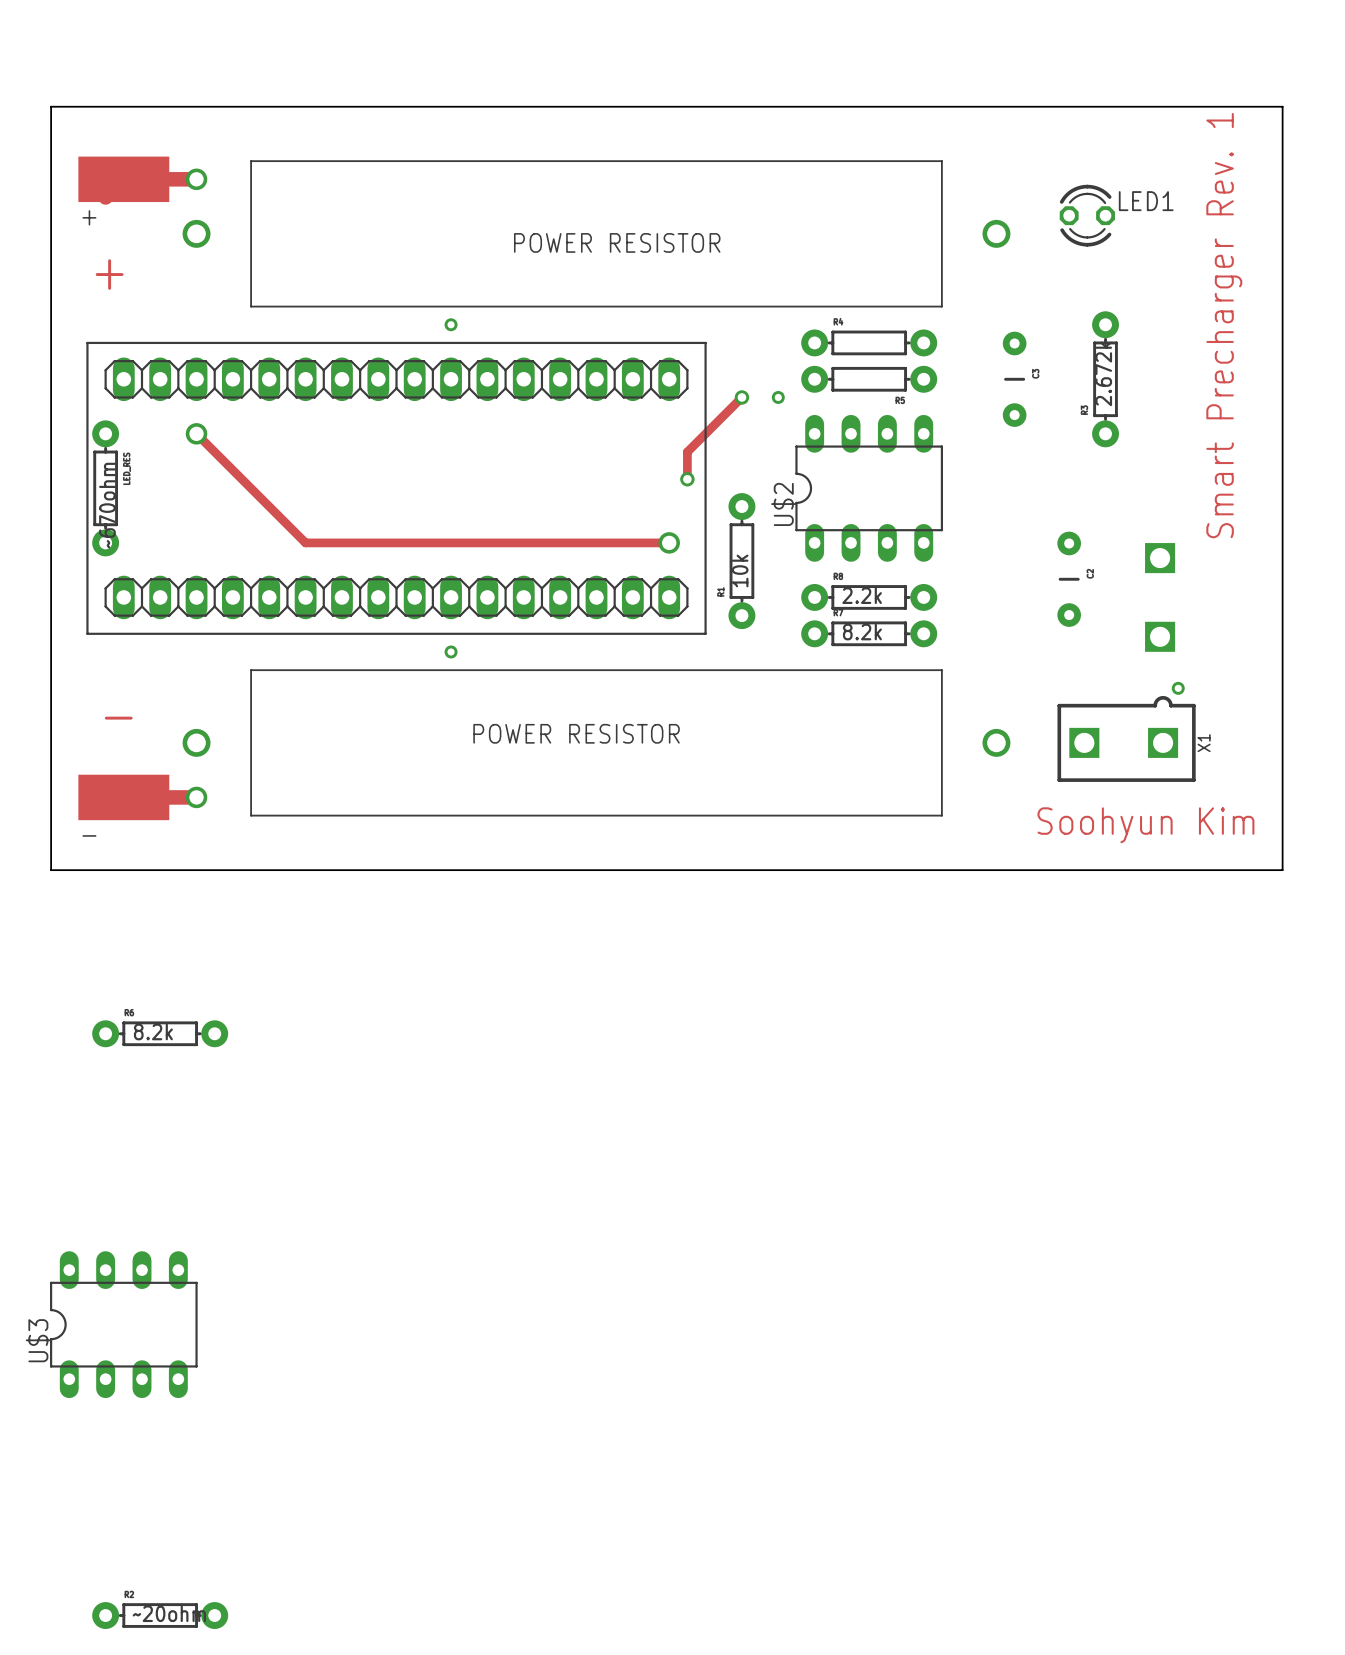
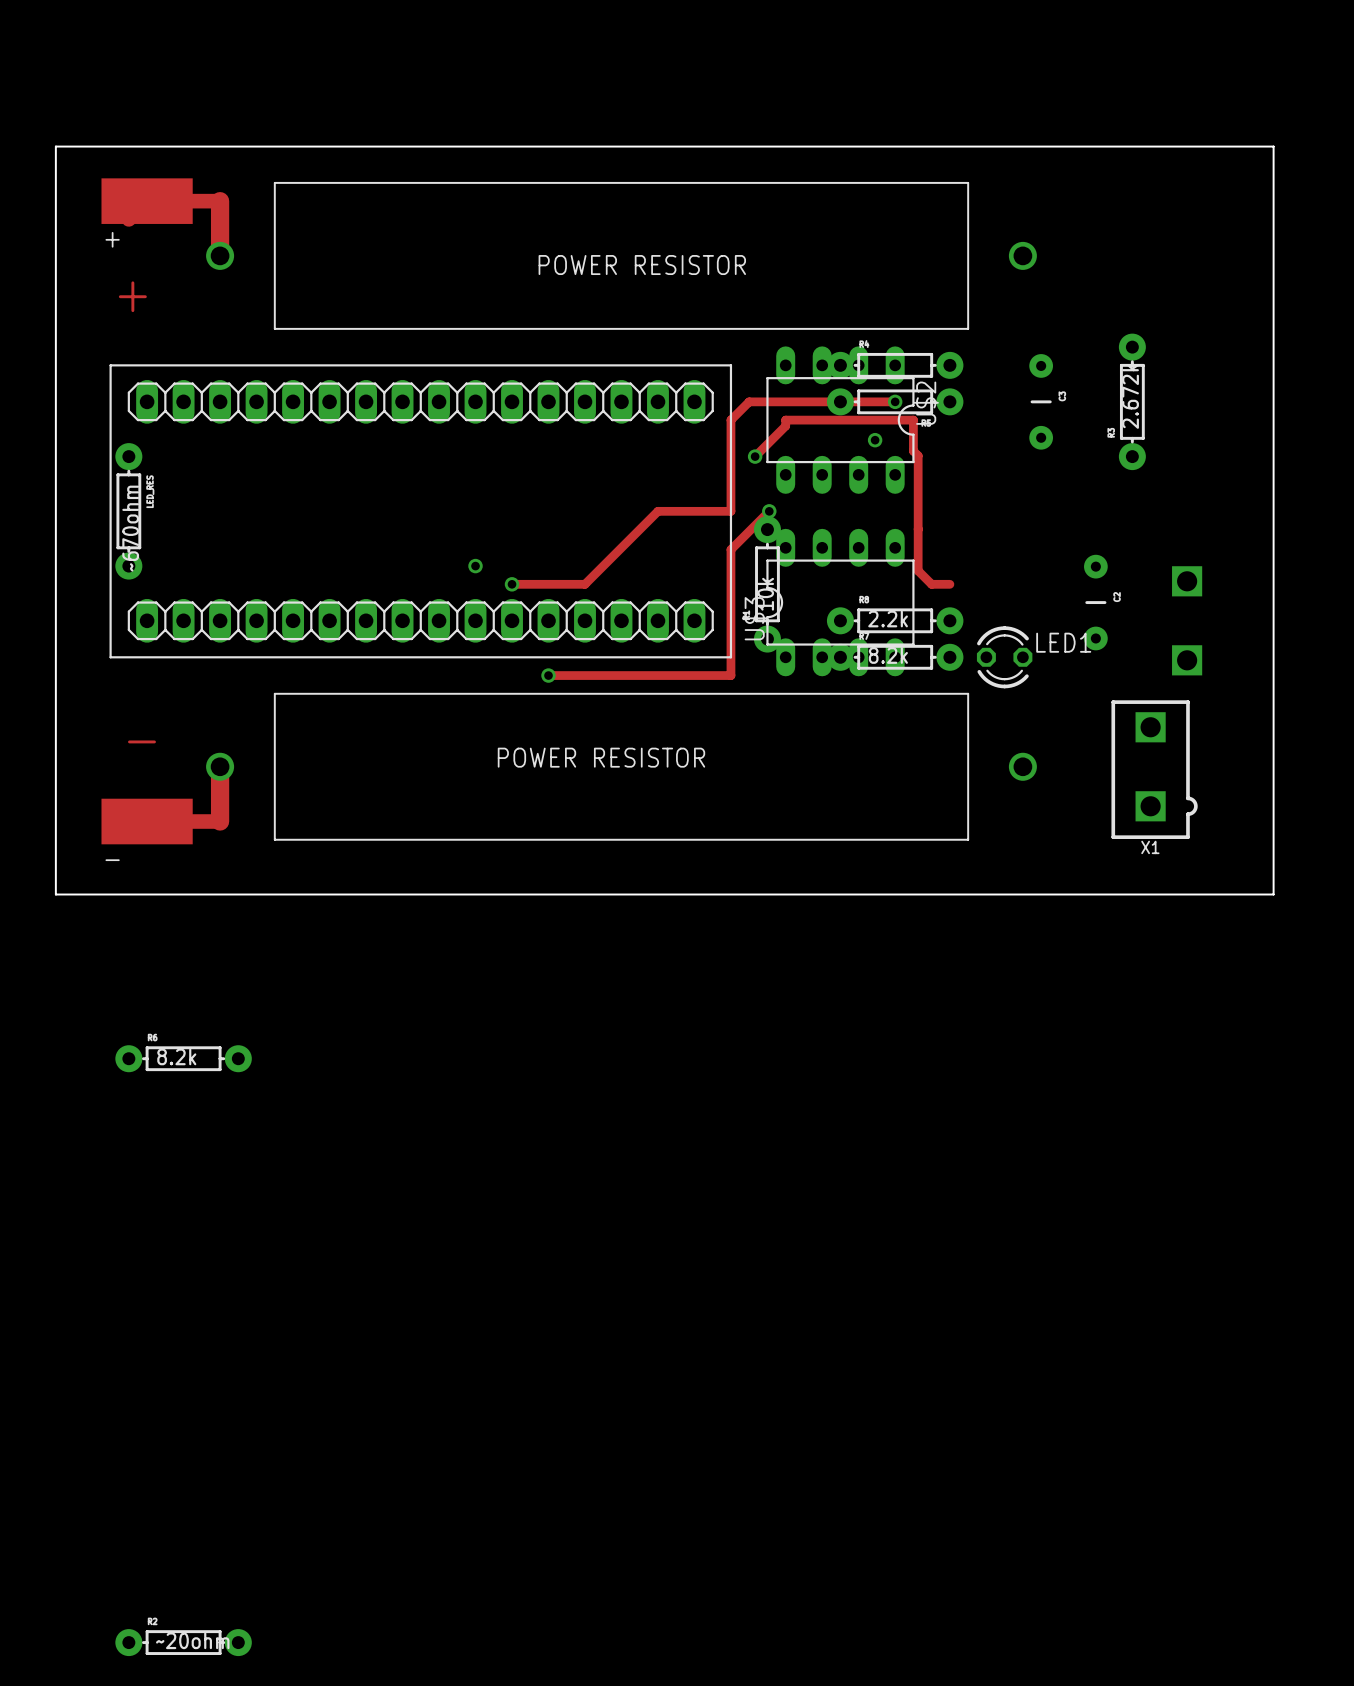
track: none -> (220, 201) (220, 255)
via: (196, 179) -> none
LED1 position: (1087, 215) -> (1004, 657)
via: (451, 324) -> none
text: Smart Precharger Rev. 1 (1224, 325) -> none
track: none -> (895, 401) (749, 401) (730, 420) (730, 511) (657, 511) (585, 584) (512, 584)
via: none -> (895, 401)
track: (741, 397) (687, 452) (687, 479) -> none
via: (741, 397) -> none
via: (778, 397) -> none
via: none -> (875, 440)
track: (196, 433) (305, 542) (669, 542) -> none
via: (196, 433) -> none
track: none -> (755, 456) (785, 426) (785, 420) (913, 420) (913, 451) (918, 455) (918, 570) (931, 584) (949, 584)
via: none -> (755, 456)
via: (687, 479) -> none
track: none -> (769, 511) (730, 549) (730, 675) (548, 675)
via: none -> (769, 511)
U$2 rotation: 0° (869, 488) -> 180° (840, 420)
U$2 position: (869, 488) -> (840, 420)
via: none -> (475, 566)
via: (669, 542) -> none
via: none -> (512, 584)
via: (451, 651) -> none
via: none -> (548, 675)
via: (1178, 688) -> none
X1 rotation: 0° (1126, 738) -> 90° clockwise (1154, 769)
track: none -> (220, 766) (220, 821)
via: (196, 797) -> none
text: Soohyun Kim (1145, 825) -> none
board edge: (51, 870) (51, 106) (1282, 106) (1282, 870) (1246, 870) -> (74, 894) (55, 894) (55, 146) (1273, 146) (1273, 894)
U$3 position: (123, 1324) -> (840, 602)

